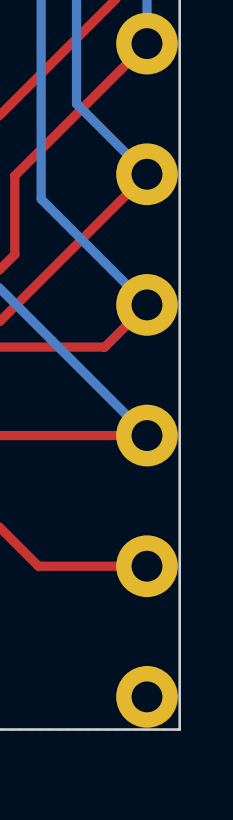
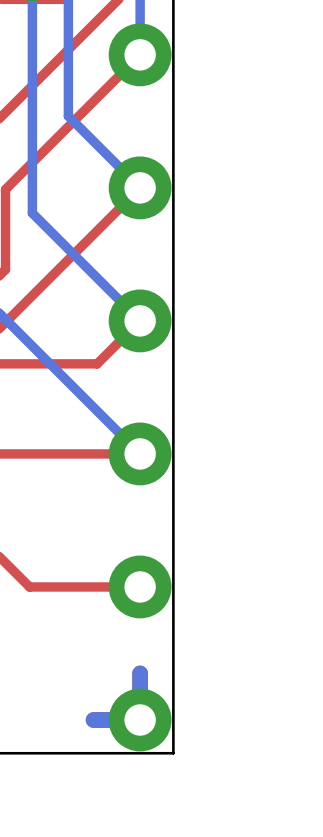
bottom track: none -> (140, 673) (140, 720) (93, 720)

